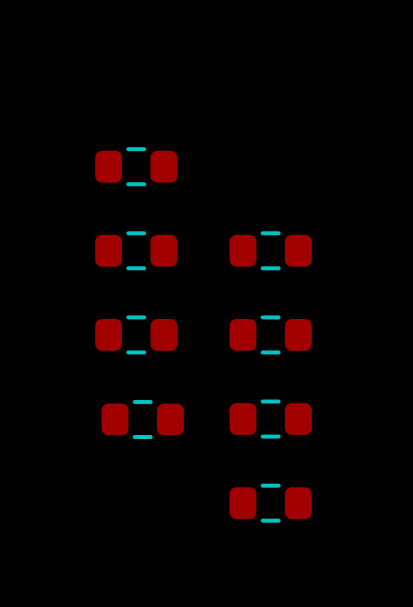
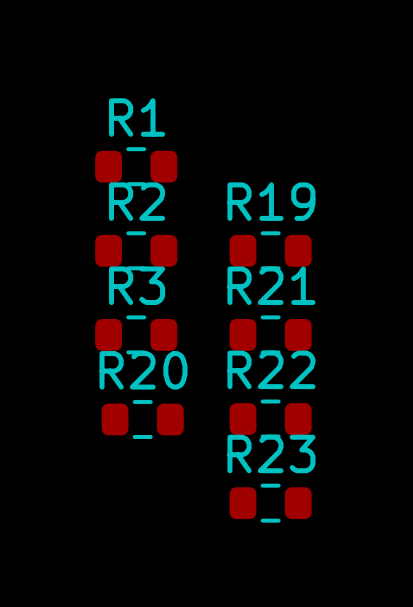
R1 name: none -> R1 (137, 117)
R2 name: none -> R2 (137, 201)
R19 name: none -> R19 (271, 201)
R3 name: none -> R3 (137, 285)
R21 name: none -> R21 (271, 285)
R22 name: none -> R22 (271, 369)
R20 name: none -> R20 (143, 370)
R23 name: none -> R23 (271, 453)

